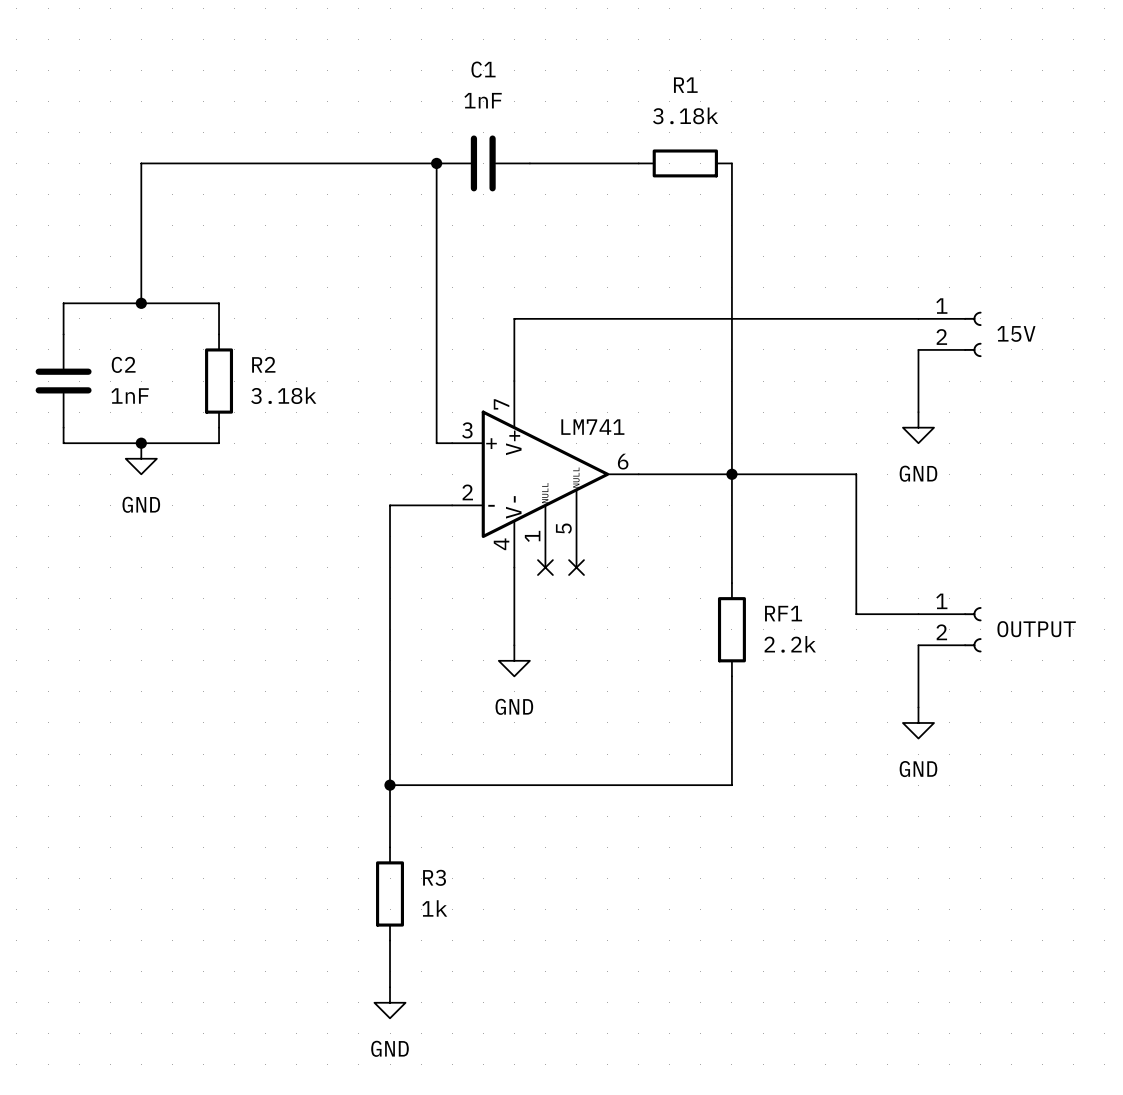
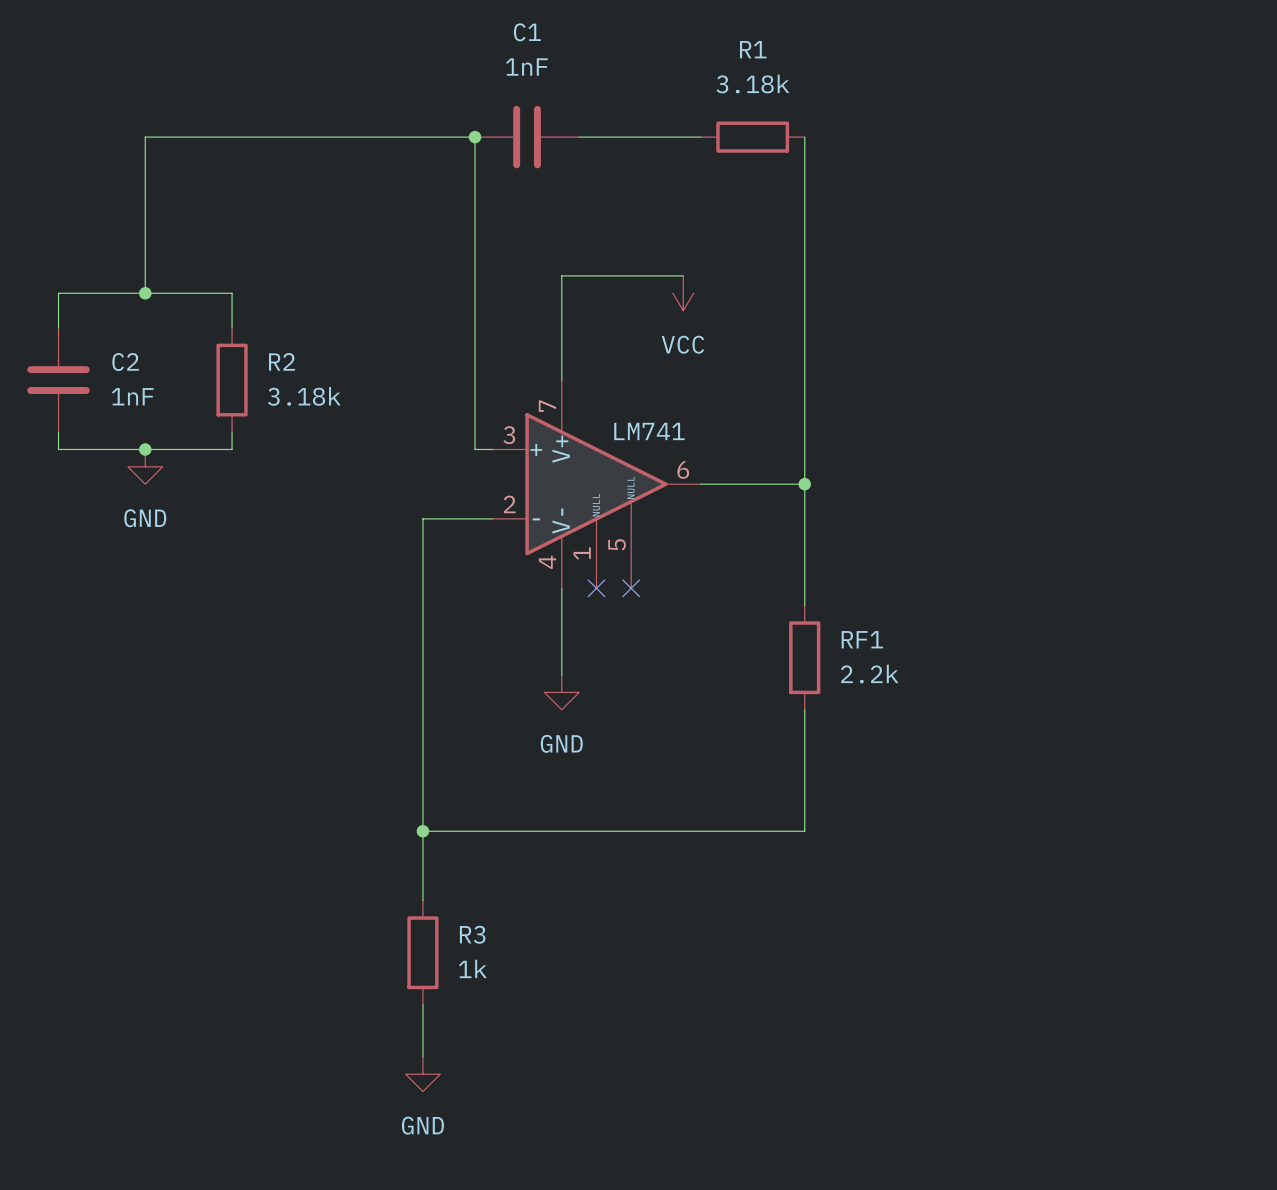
power symbol: none -> VCC (683, 293)
wire: (514, 318) (918, 318) -> (561, 310) (561, 275) (683, 275)
part: 15V (950, 334) -> none
wire: (918, 349) (918, 412) -> none
power symbol: GND (918, 427) -> none
wire: (731, 474) (856, 474) (856, 614) (918, 614) -> none
part: OUTPUT (950, 629) -> none
wire: (918, 645) (918, 707) -> none
power symbol: GND (918, 722) -> none

